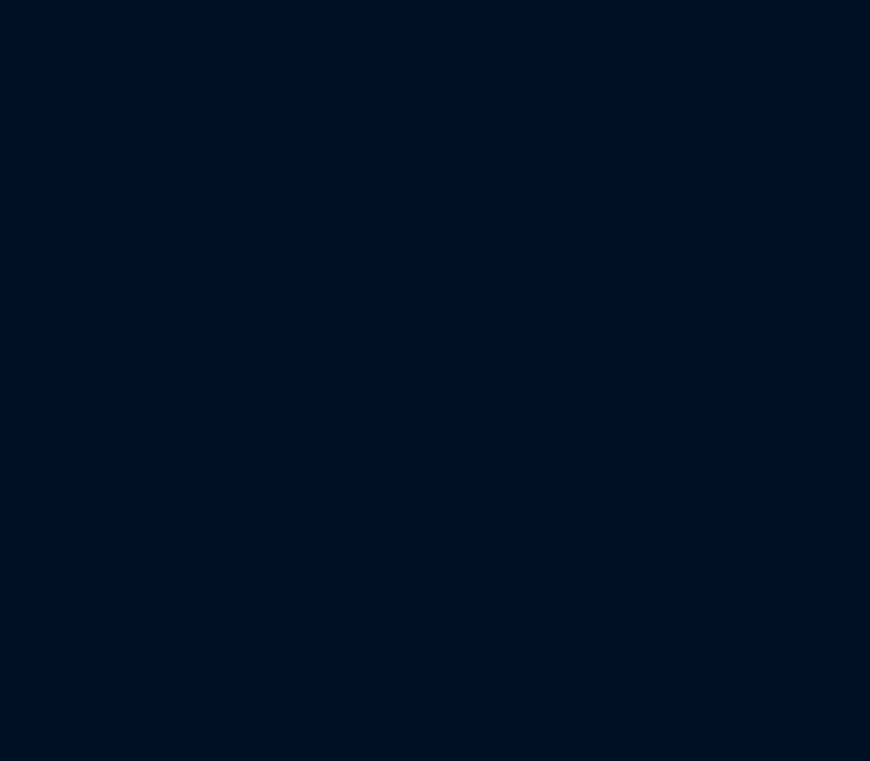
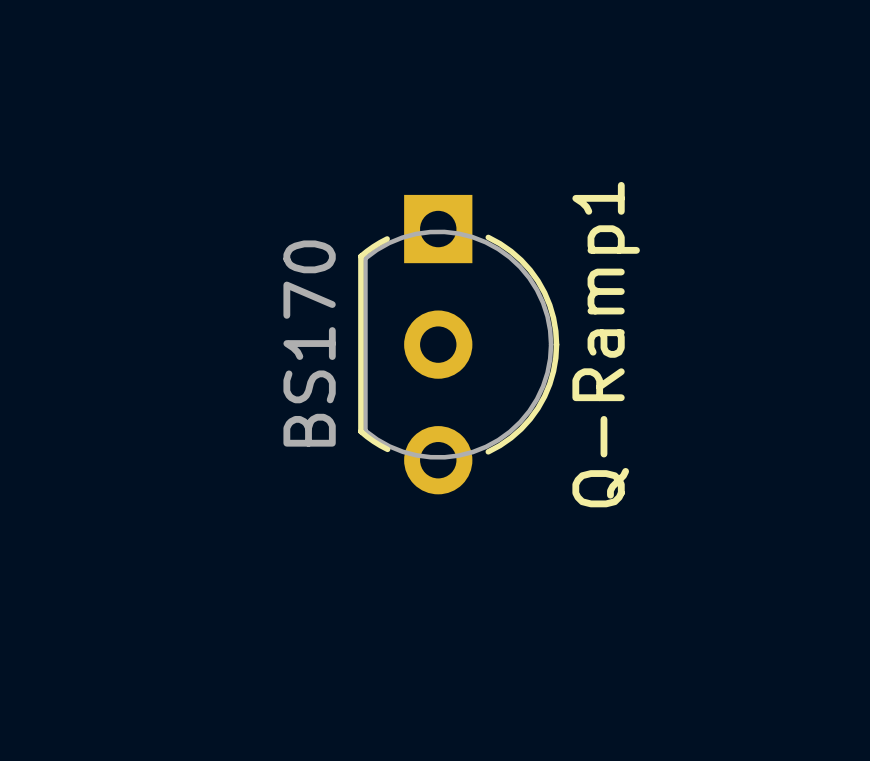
Q-Ramp1: none -> BS170 (458, 344)

